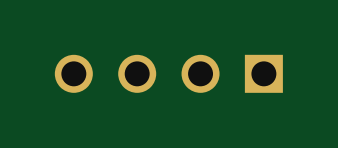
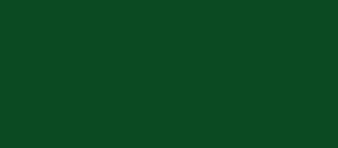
part: (168, 73) -> none

